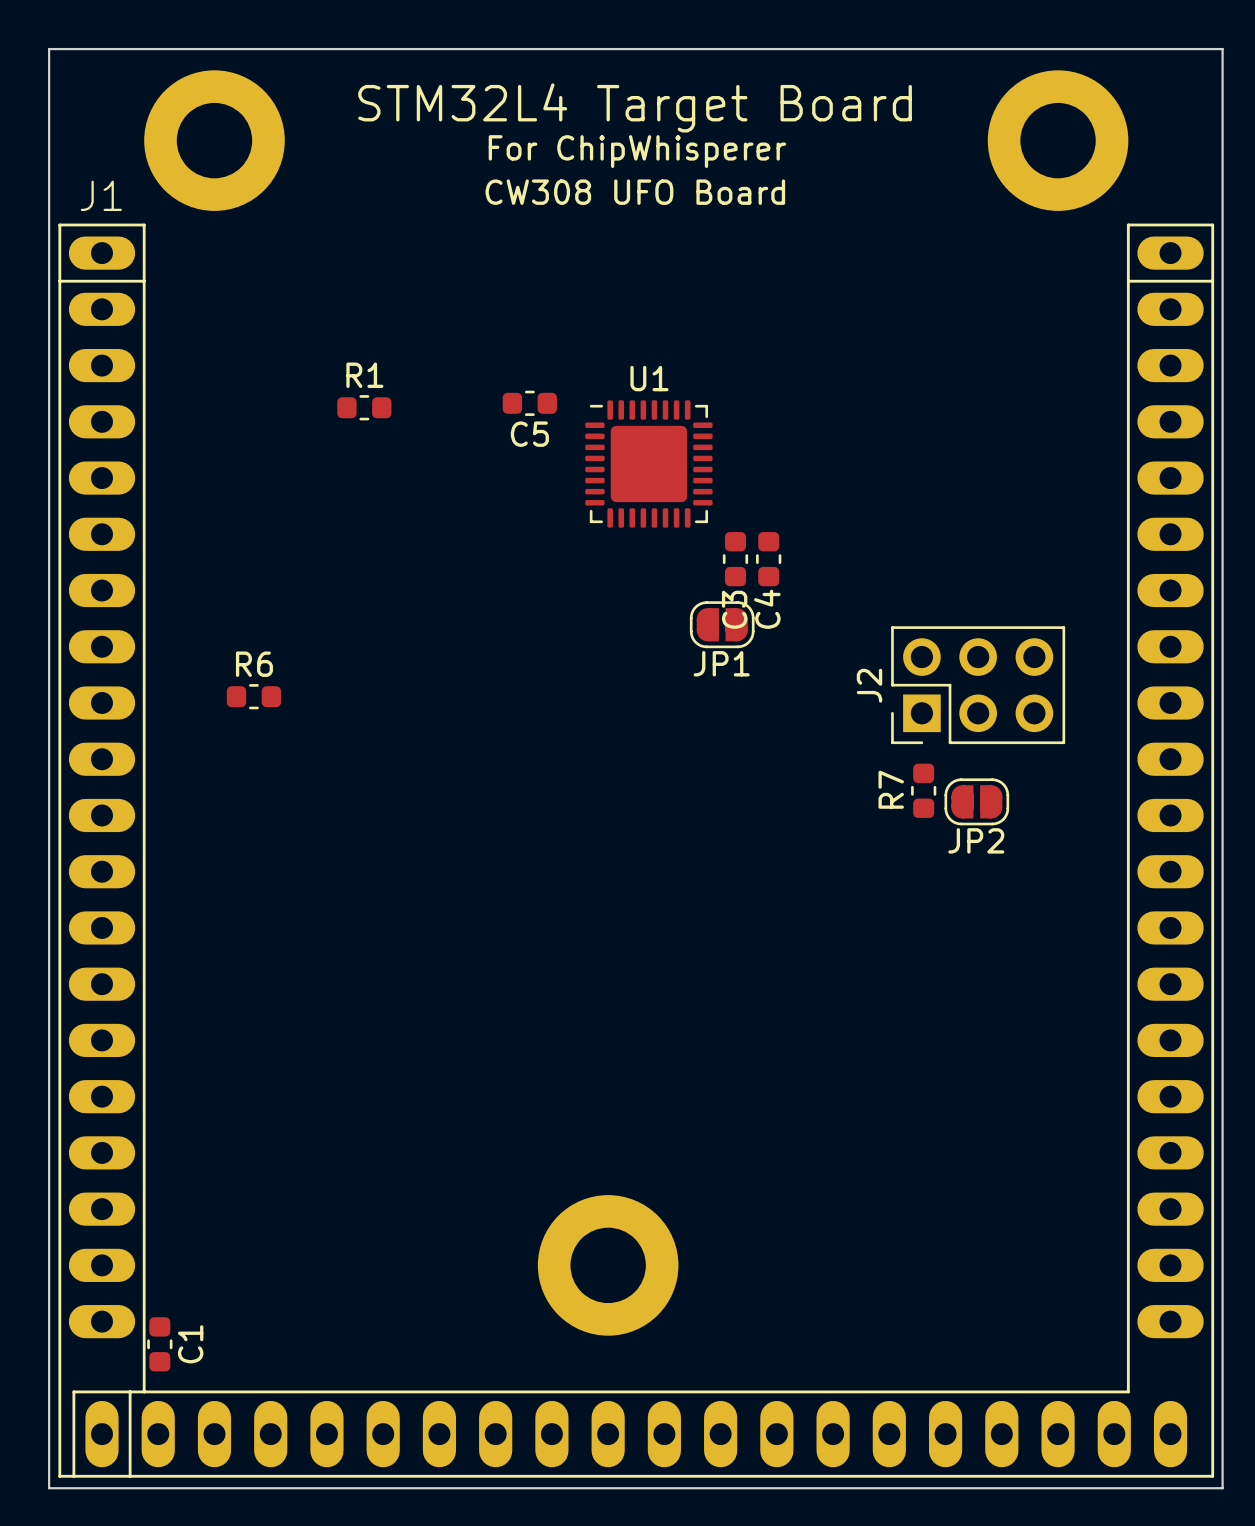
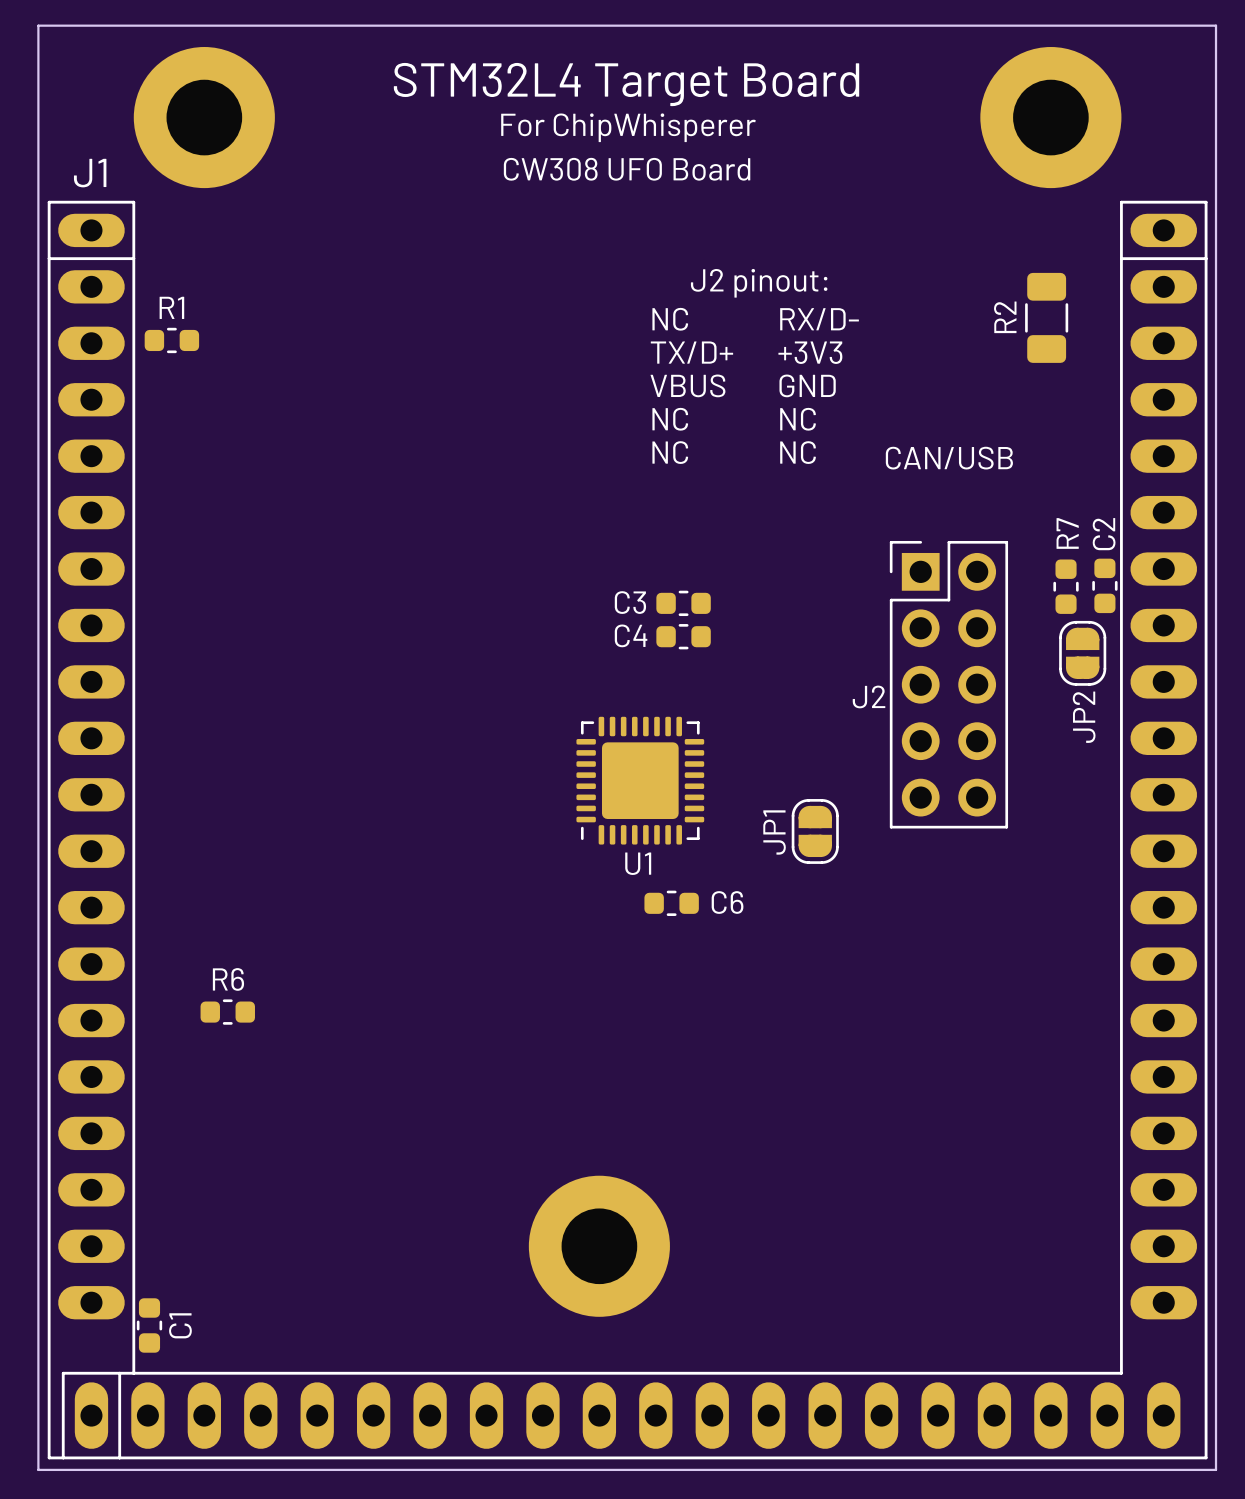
text: none -> J2 pinout: (759, 283)
R2: none -> (1046, 317)
text: none -> NC (670, 319)
text: none -> RX/D- (819, 319)
text: none -> +3V3 (810, 352)
text: none -> TX/D+ (691, 352)
U1 name position: U1 (649, 378) -> U1 (638, 863)
C5: (529, 403) -> none
R1 position: (364, 407) -> (171, 340)
text: none -> VBUS (687, 385)
text: none -> GND (807, 385)
text: none -> NC (670, 419)
text: none -> NC (798, 419)
U1 rotation: 0° (648, 463) -> 90° counterclockwise (640, 780)
U1 position: (648, 463) -> (640, 780)
text: none -> NC (670, 452)
text: none -> NC (798, 452)
text: none -> CAN/USB (949, 458)
C3 rotation: 0° (735, 559) -> 90° clockwise (683, 603)
C3 position: (735, 559) -> (683, 603)
C4 rotation: 0° (768, 559) -> 90° clockwise (683, 636)
C4 position: (768, 559) -> (683, 636)
C2: none -> (1104, 585)
JP1 rotation: 0° (722, 624) -> 90° clockwise (815, 831)
JP1 position: (722, 624) -> (815, 831)
J2 footprint: [891, 626, 1066, 745] -> [889, 540, 1009, 829]
R6 position: (253, 696) -> (227, 1012)
R7 name position: R7 (891, 789) -> R7 (1067, 533)
R7 position: (923, 790) -> (1066, 586)
JP2 rotation: 0° (976, 801) -> 90° clockwise (1082, 653)
JP2 position: (976, 801) -> (1082, 653)
C6: none -> (671, 903)

